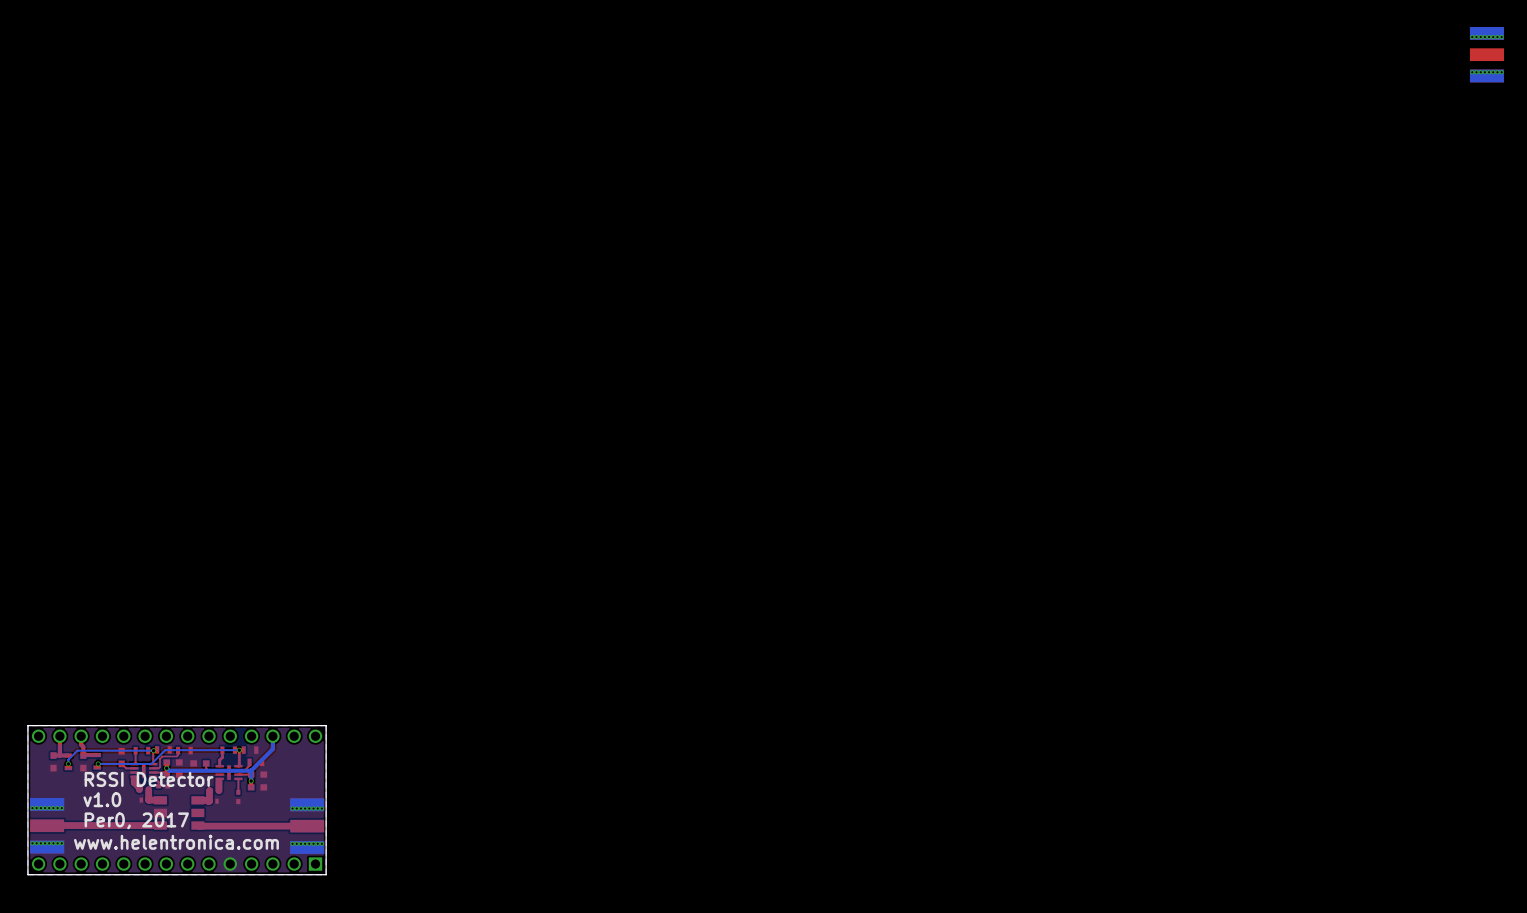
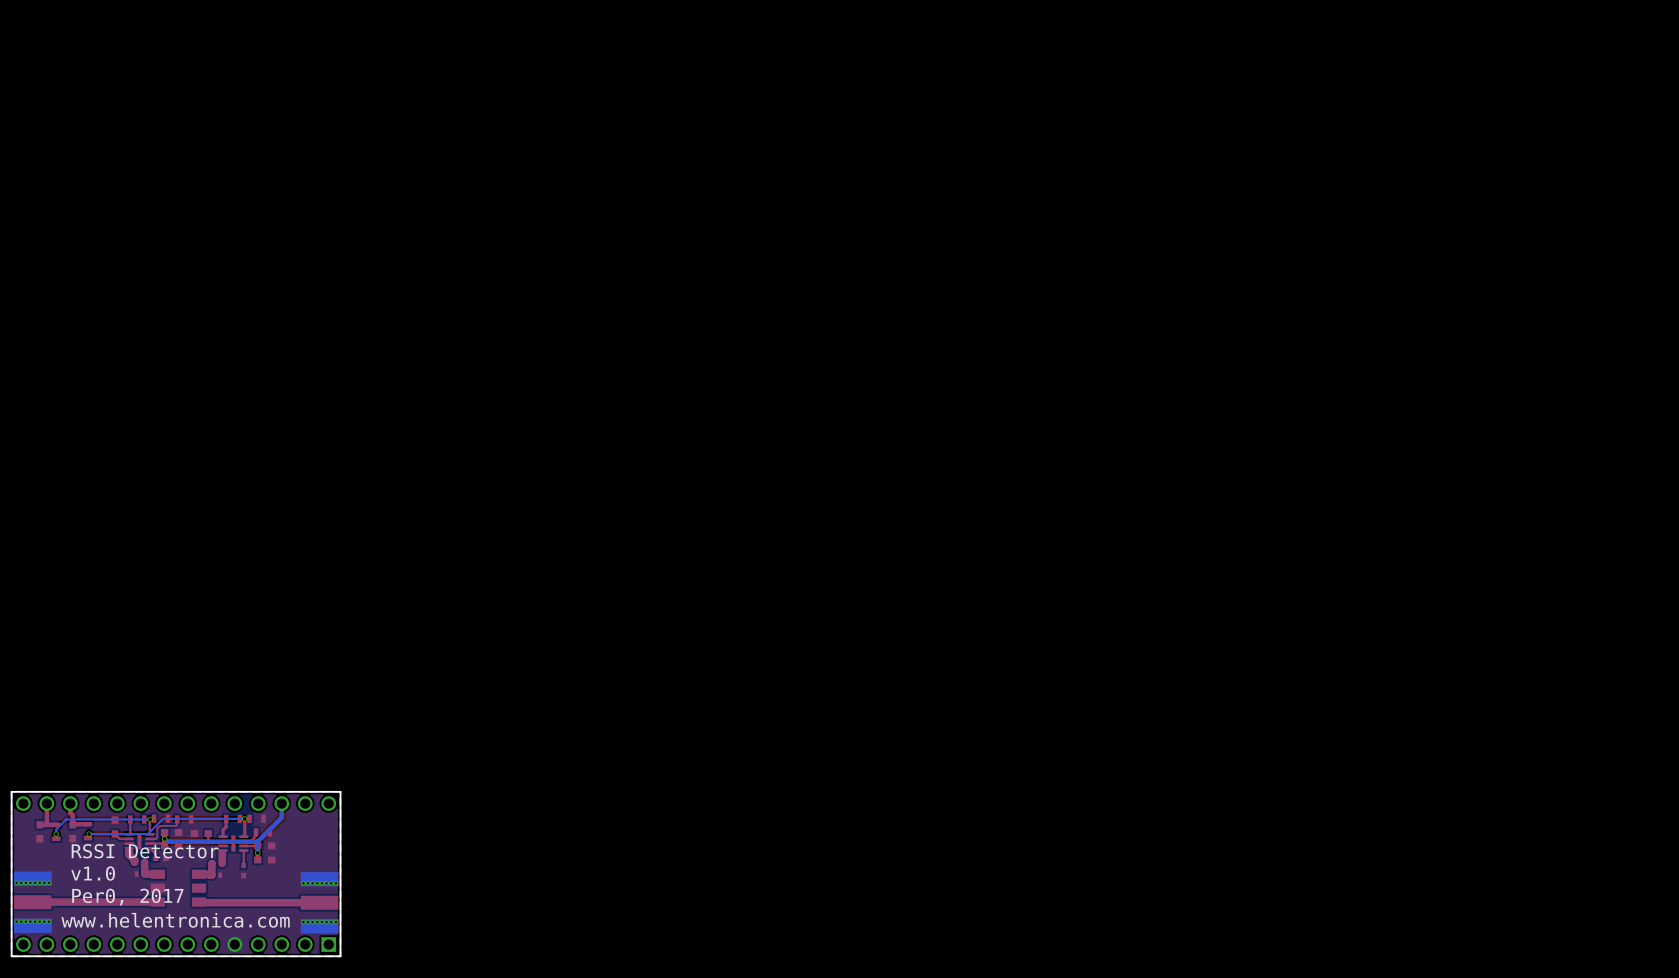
part: (1486, 54) -> none

